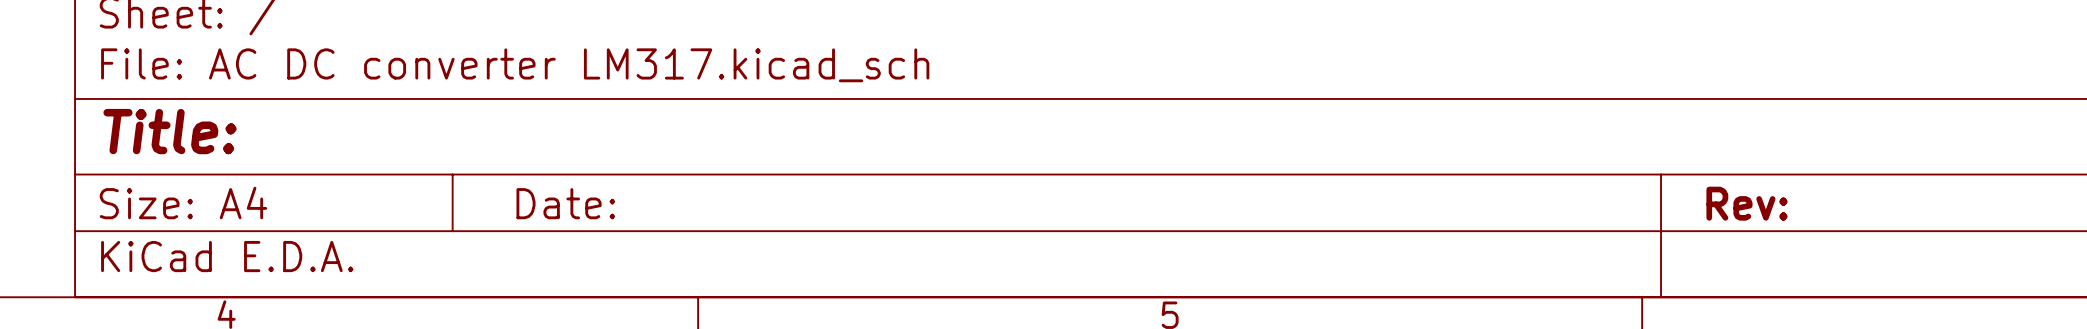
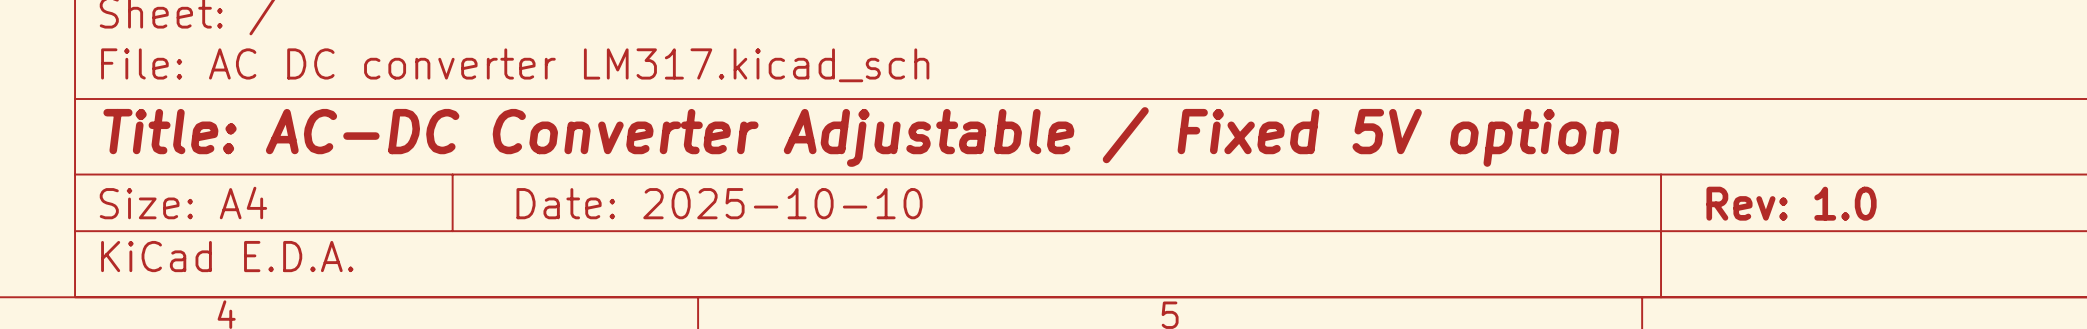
title block: Title: (170, 131) -> Title: AC-DC Converter Adjustable / Fixed 5V option (861, 136)
title block: Date: (565, 203) -> Date: 2025-10-10 (719, 203)
title block: Rev: (1747, 203) -> Rev: 1.0 (1791, 203)

